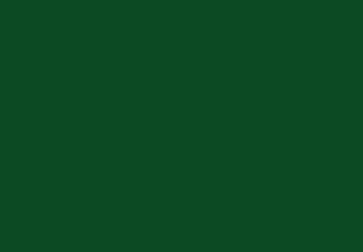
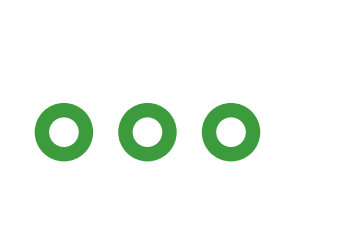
part: none -> (147, 132)

